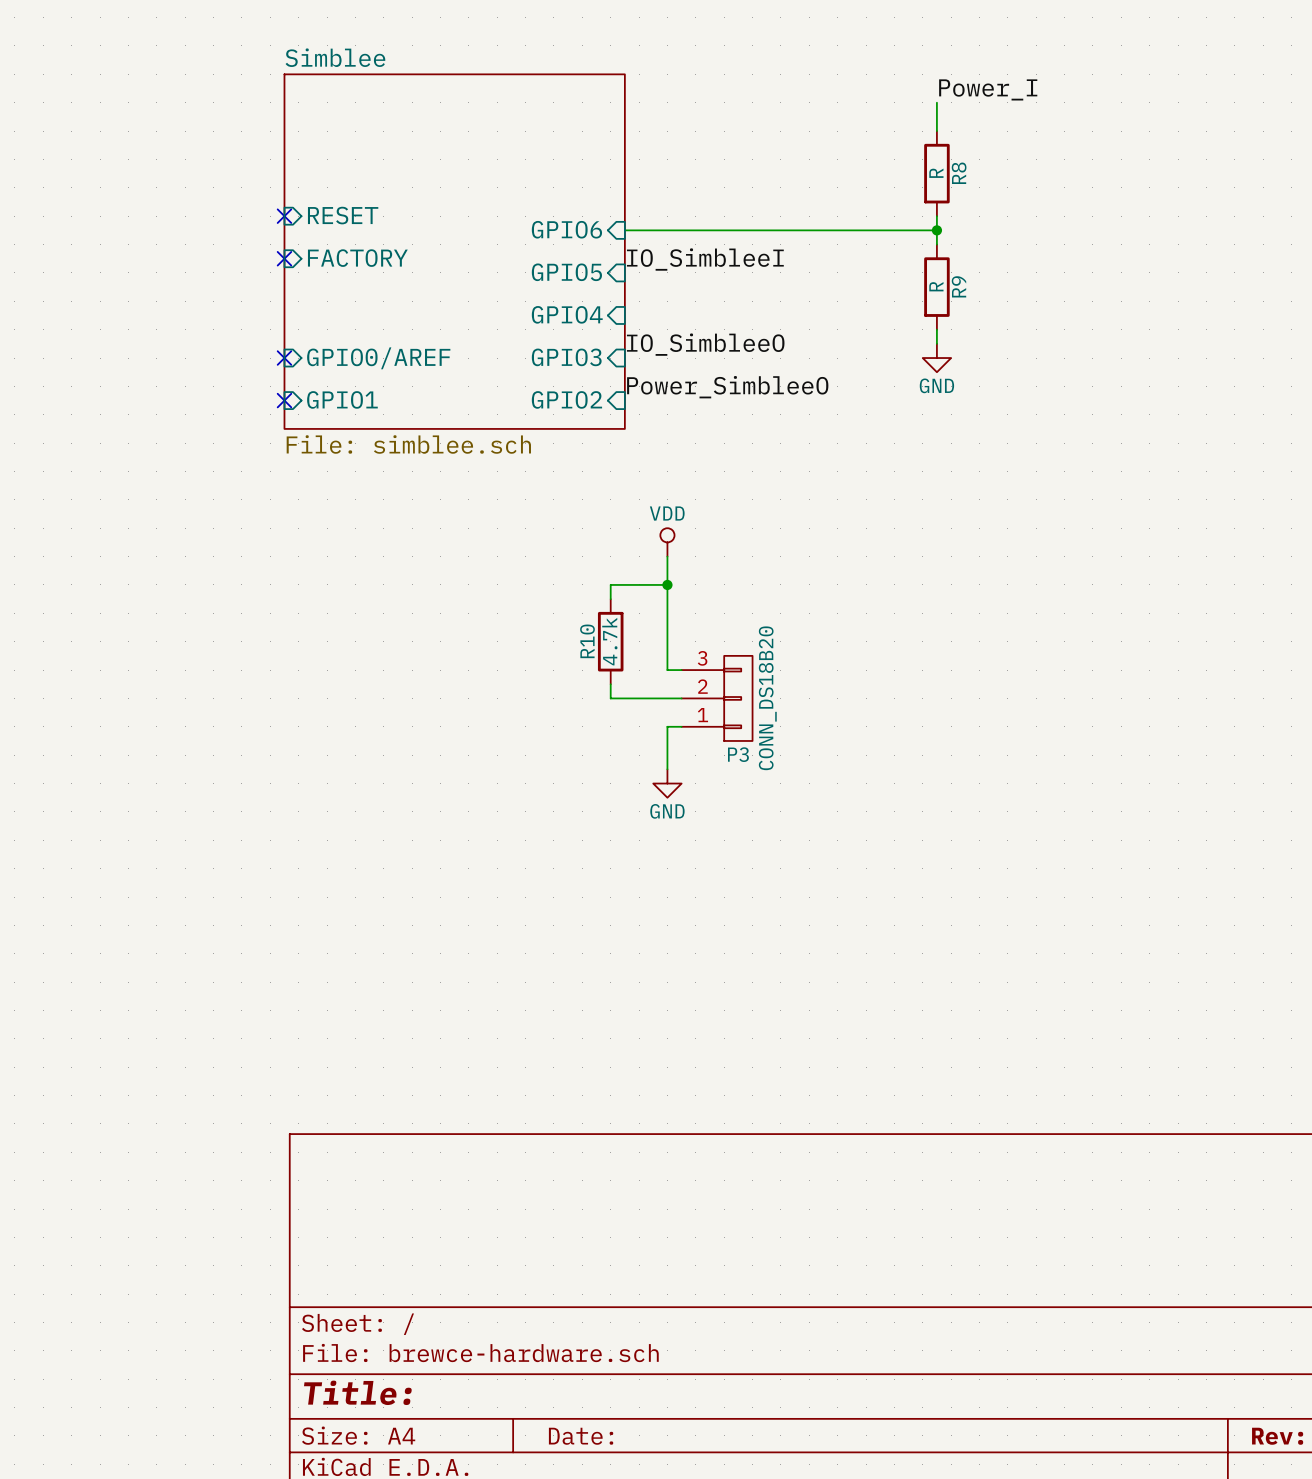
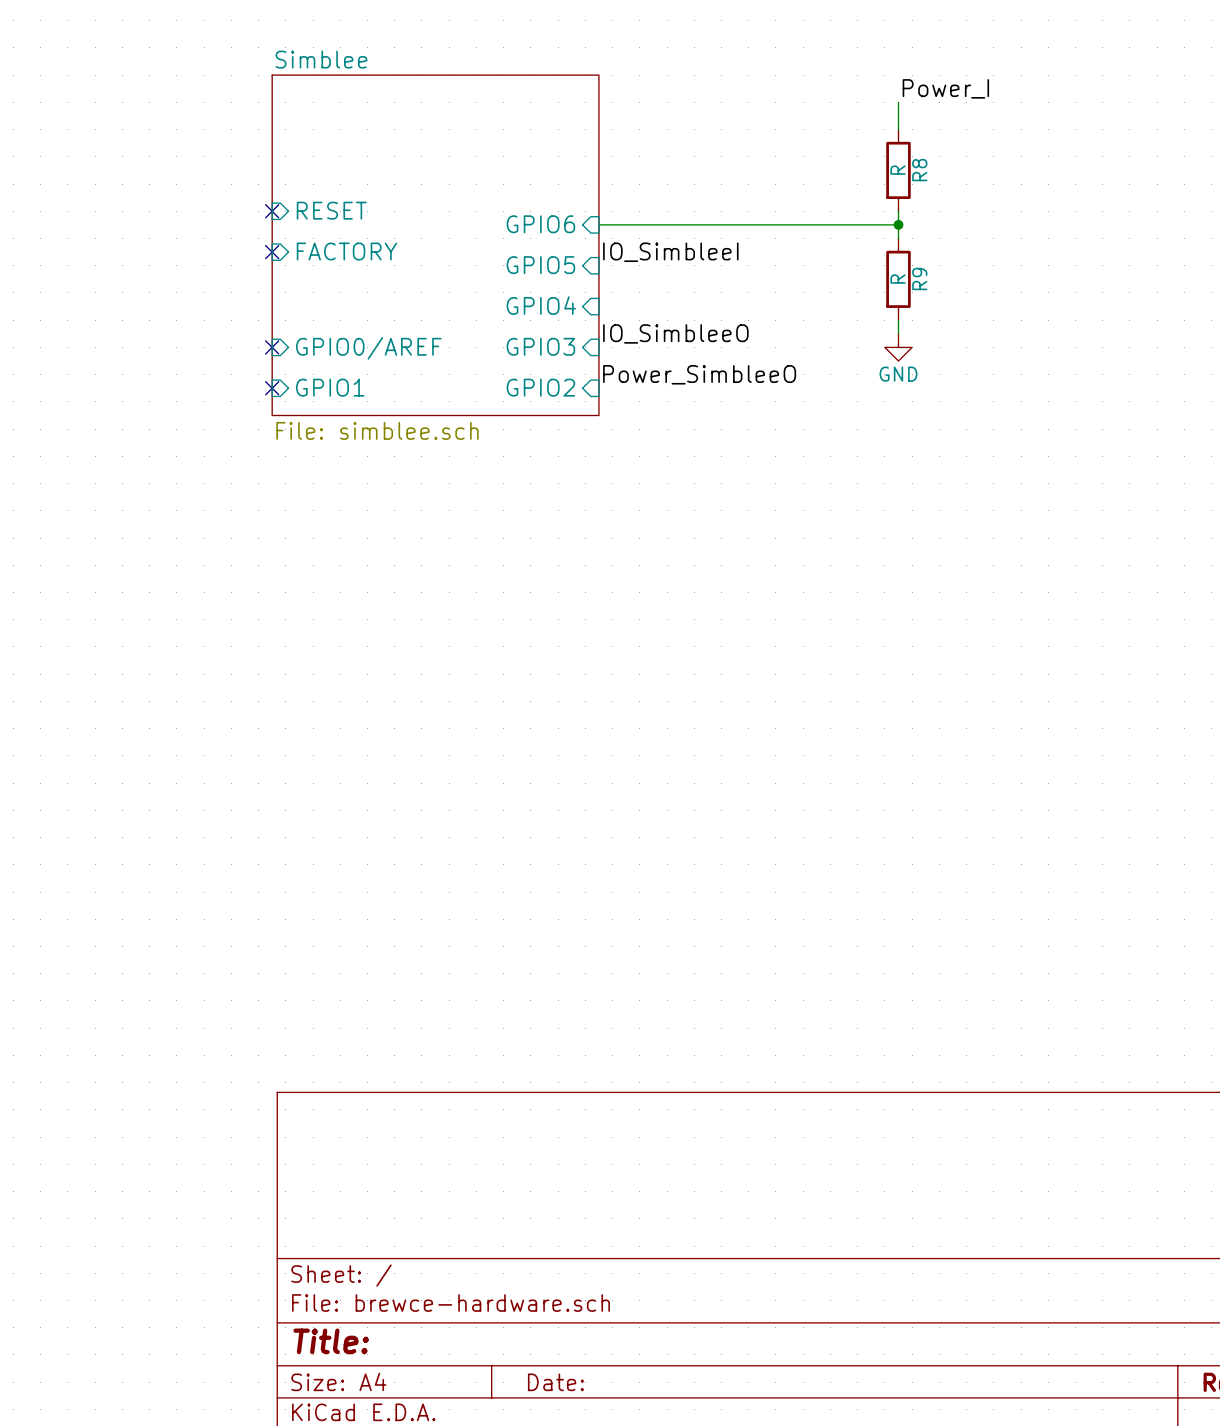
power symbol: VDD (667, 542) -> none
wire: (667, 556) (667, 670) (681, 670) -> none
wire: (667, 584) (610, 584) (610, 599) -> none
junction: (667, 584) -> none
R10: 4.7k (610, 641) -> none
wire: (610, 684) (610, 698) (681, 698) -> none
P3: CONN_DS18B20 (717, 698) -> none
wire: (681, 726) (667, 726) (667, 769) -> none
power symbol: GND (667, 783) -> none

